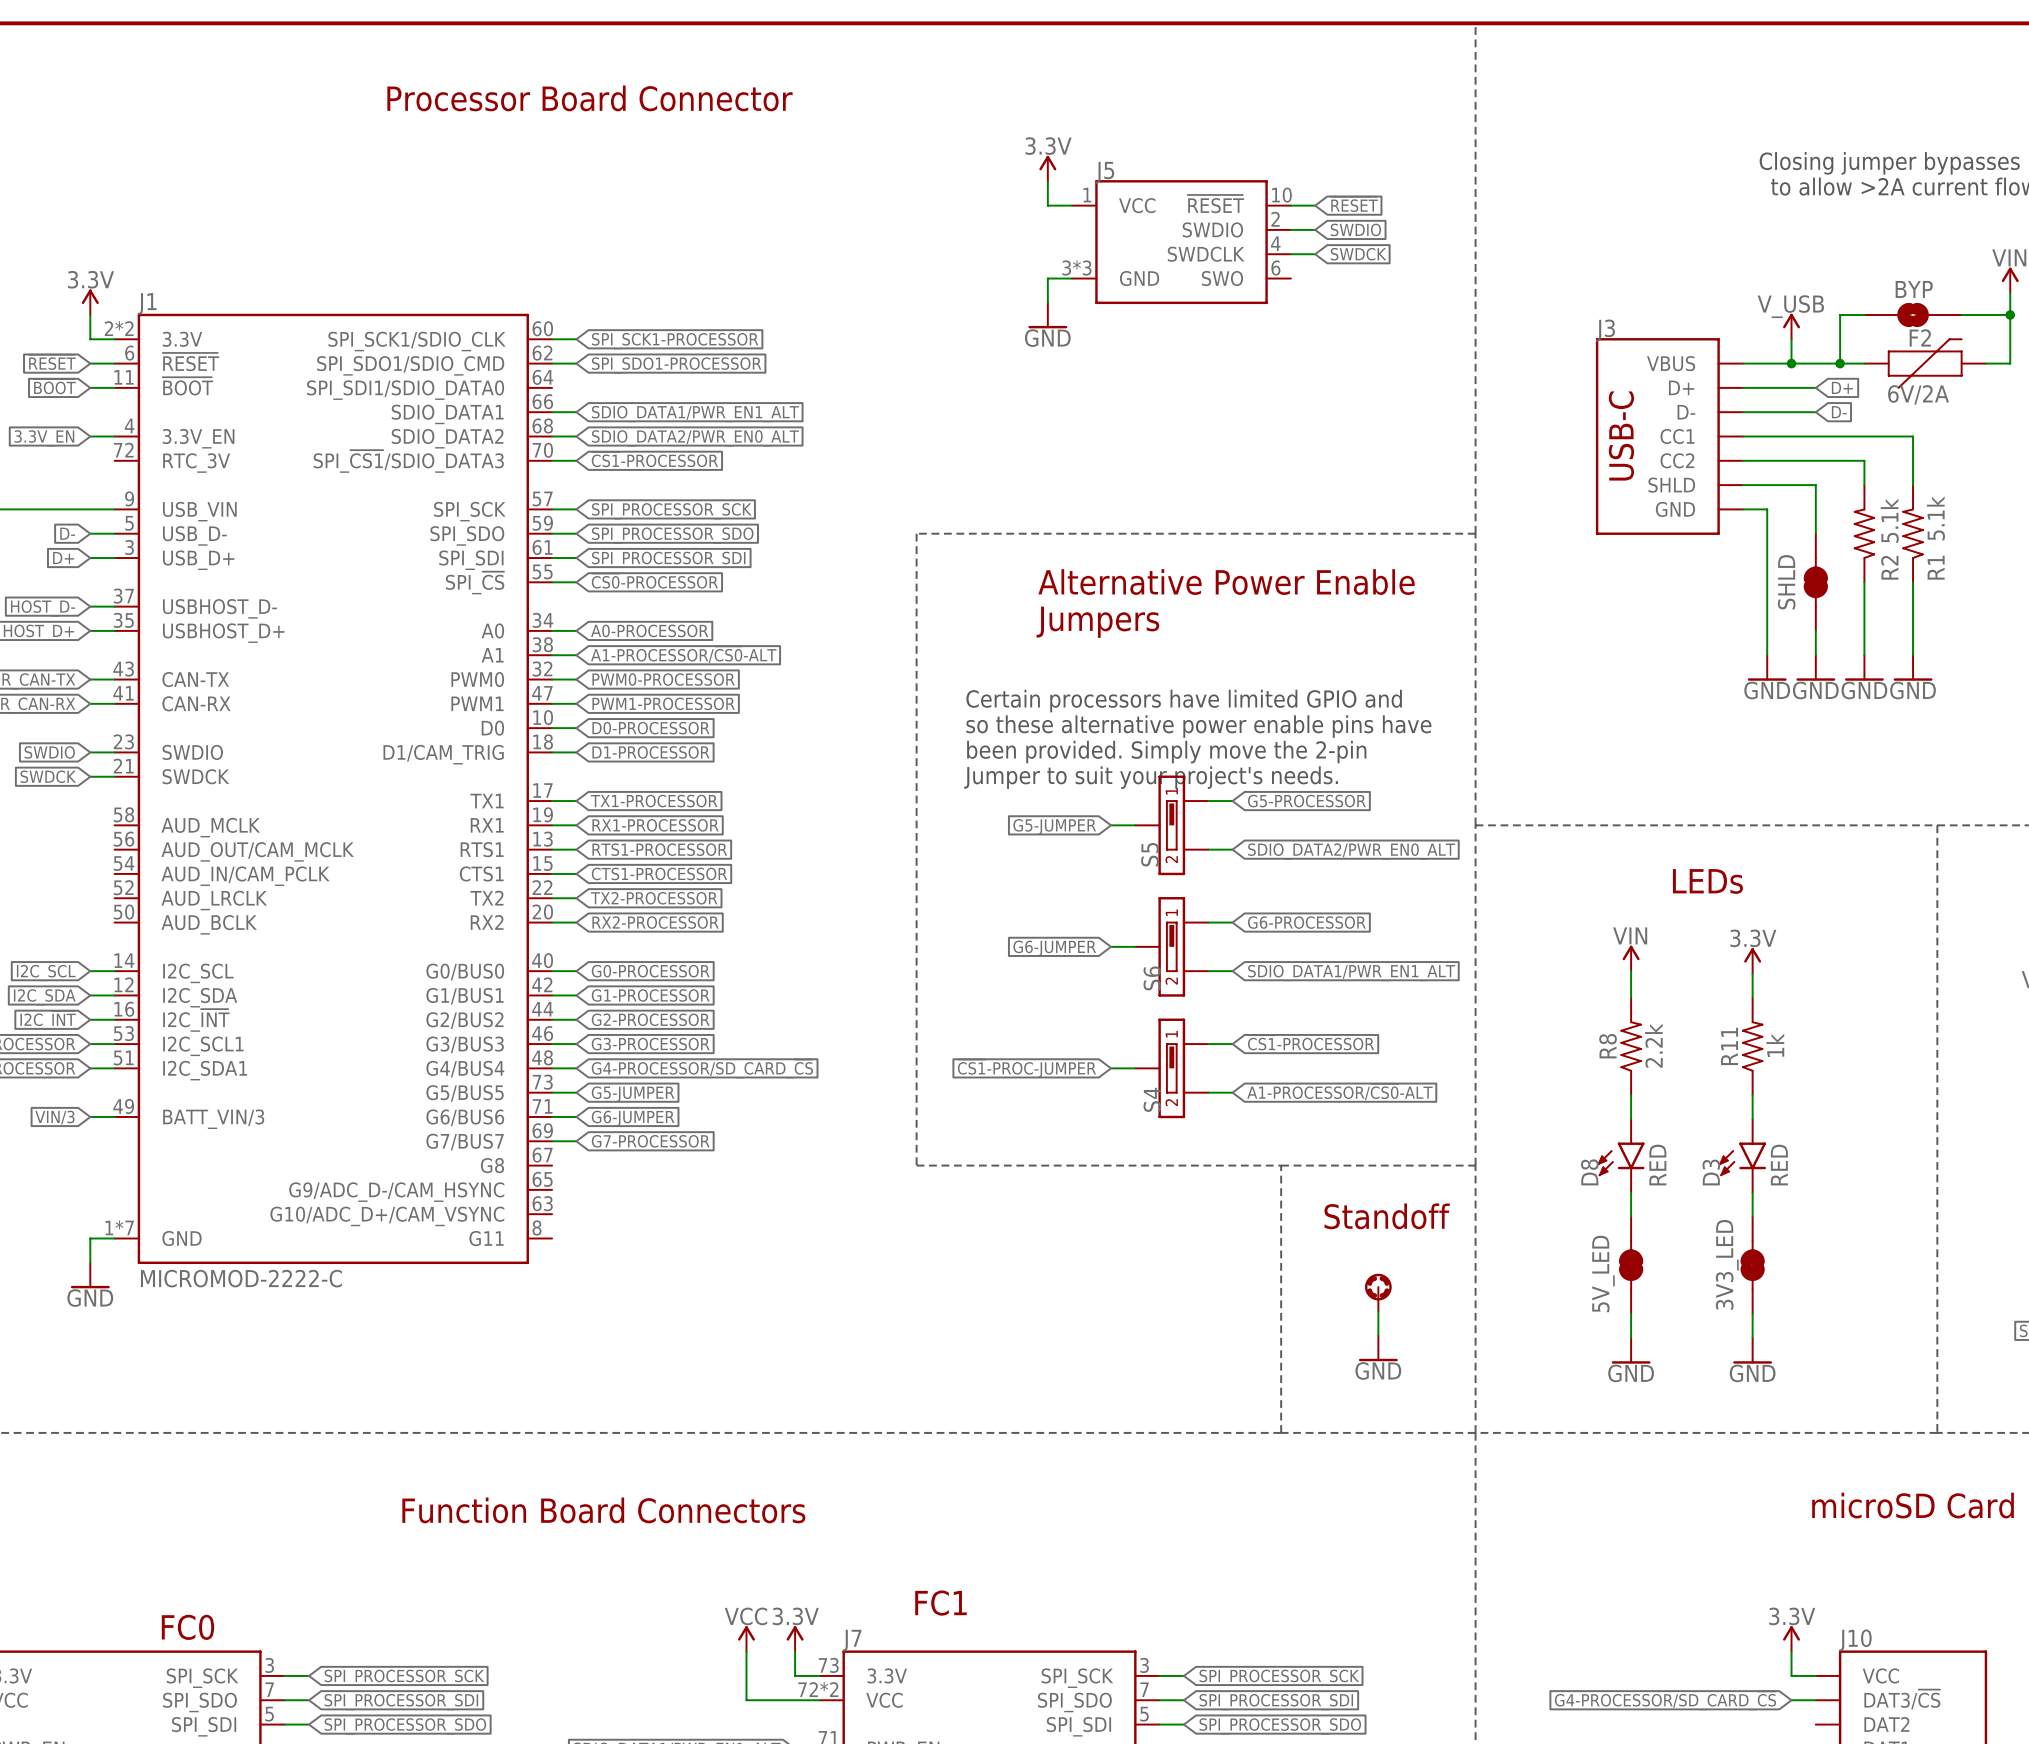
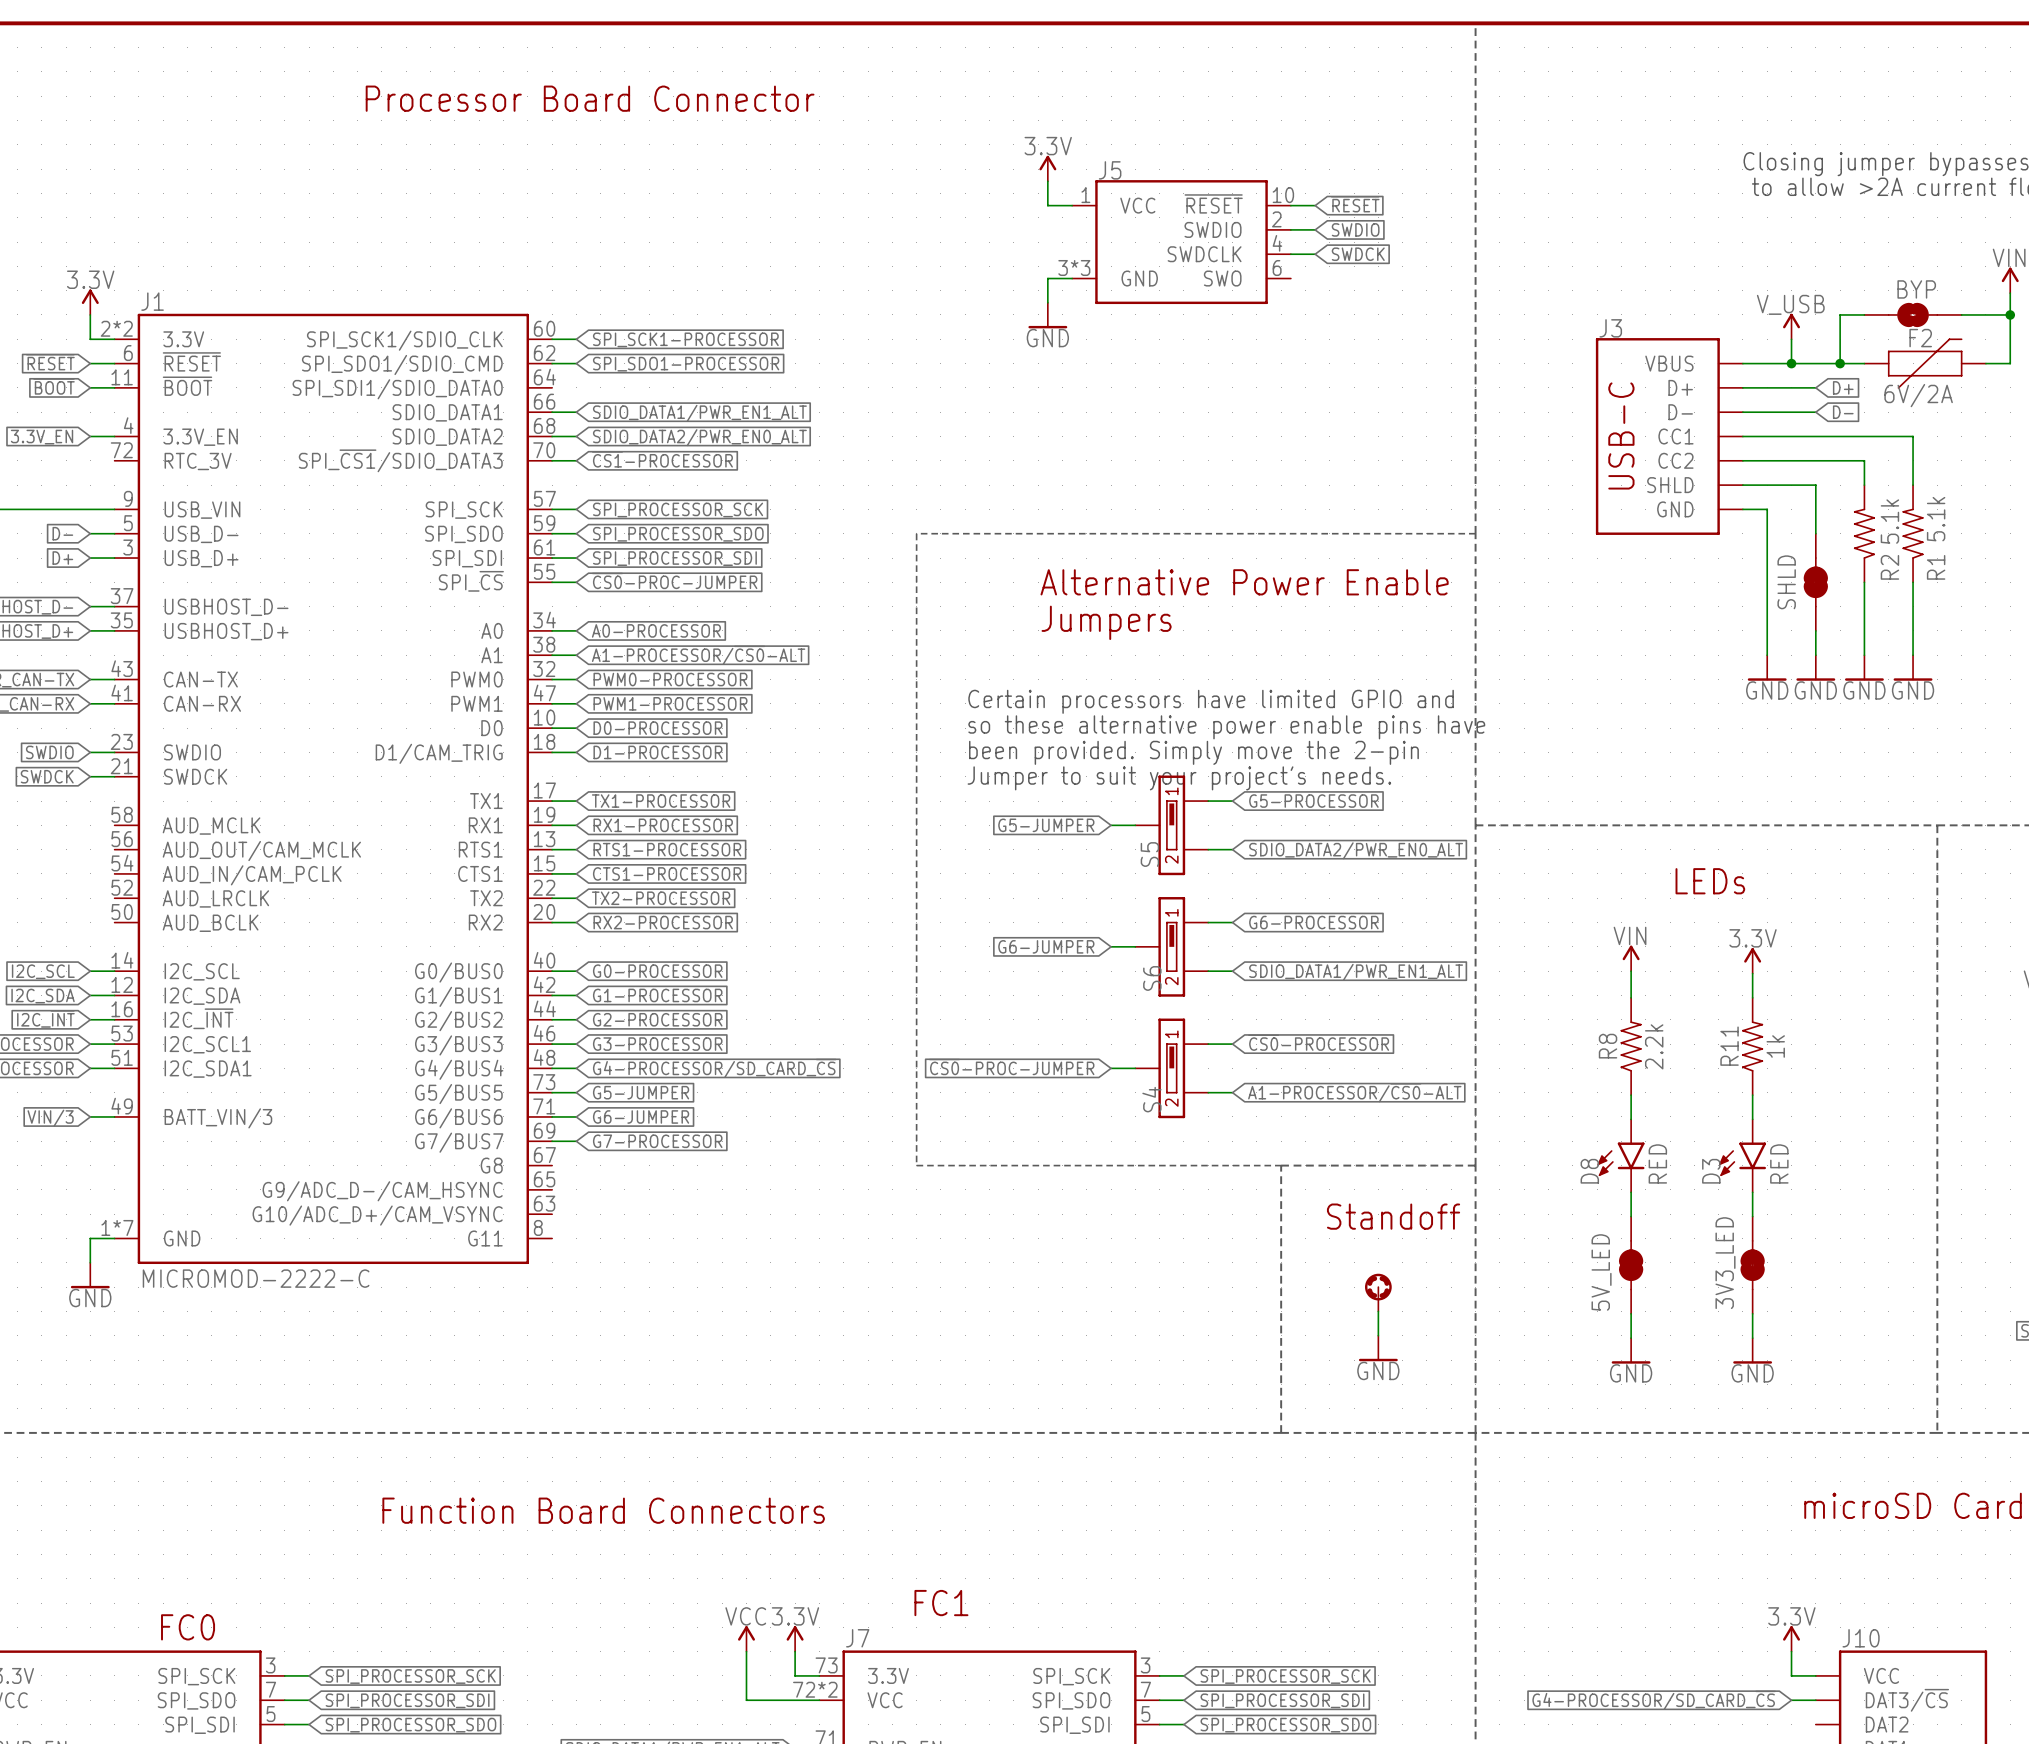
global label: ~{CS0}-PROCESSOR (654, 581) -> ~{CS0}-PROC-JUMPER (674, 580)
global label: ~{CS1}-PROCESSOR (1311, 1042) -> ~{CS0}-PROCESSOR (1318, 1042)
global label: ~{CS1}-PROC-JUMPER (1026, 1068) -> ~{CS0}-PROC-JUMPER (1011, 1066)

